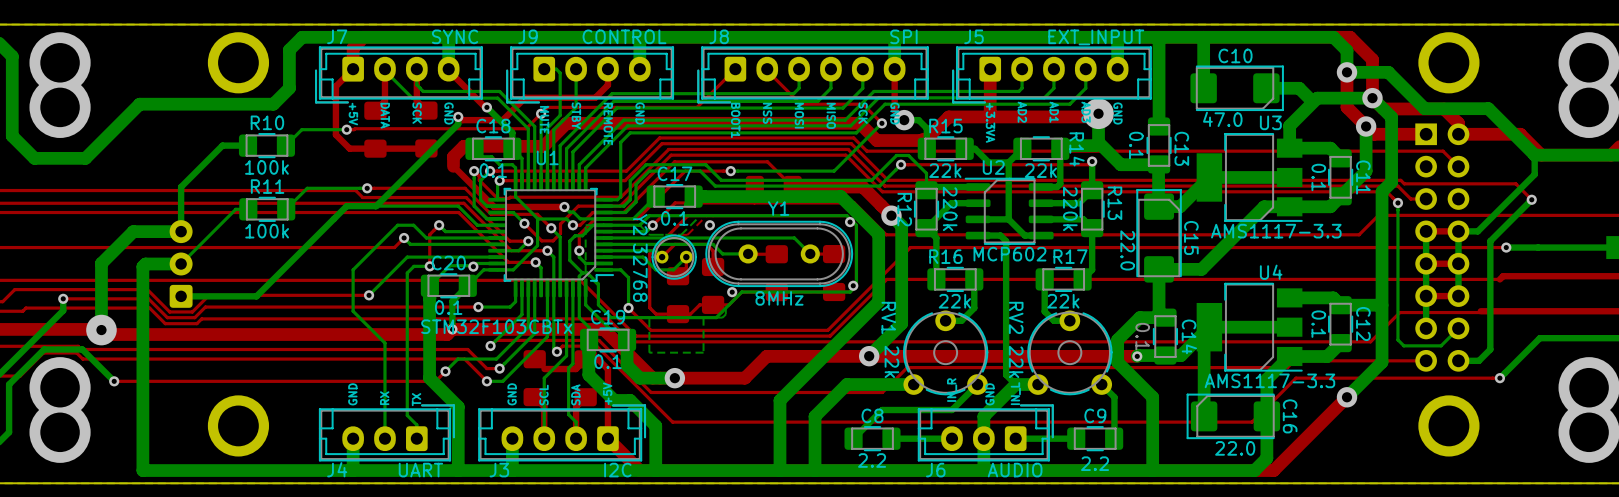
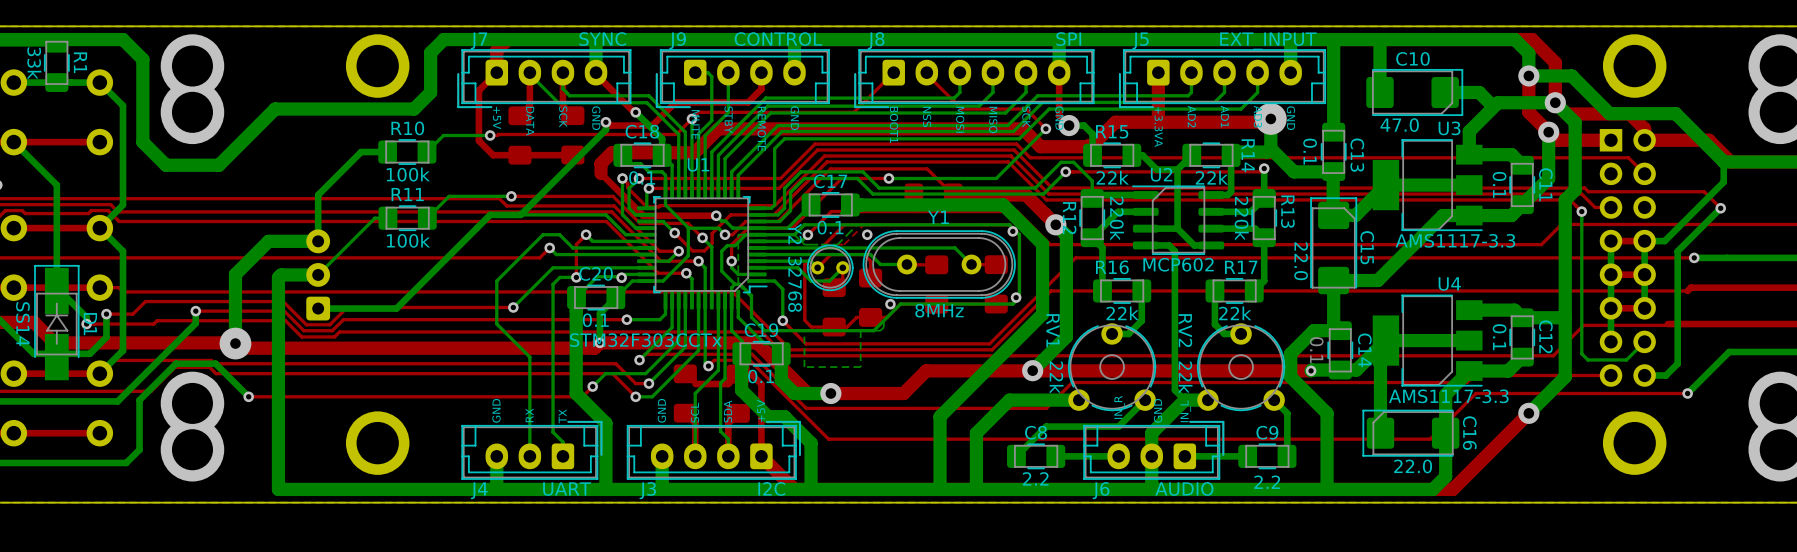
U1 value: STM32F103CBTx (496, 326) -> STM32F303CCTx (645, 340)

